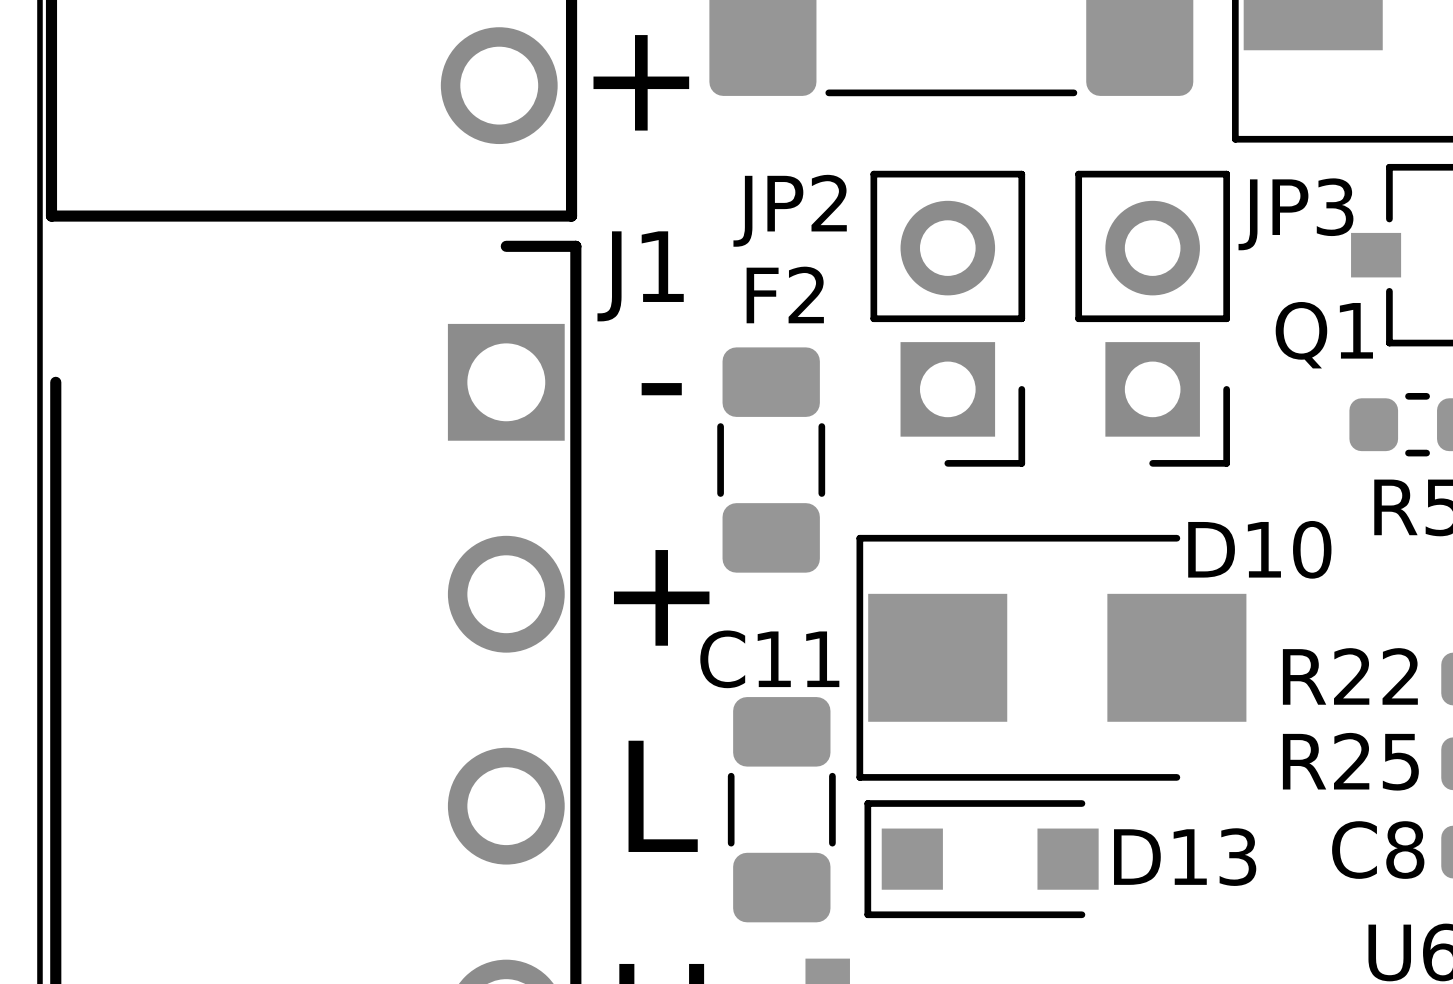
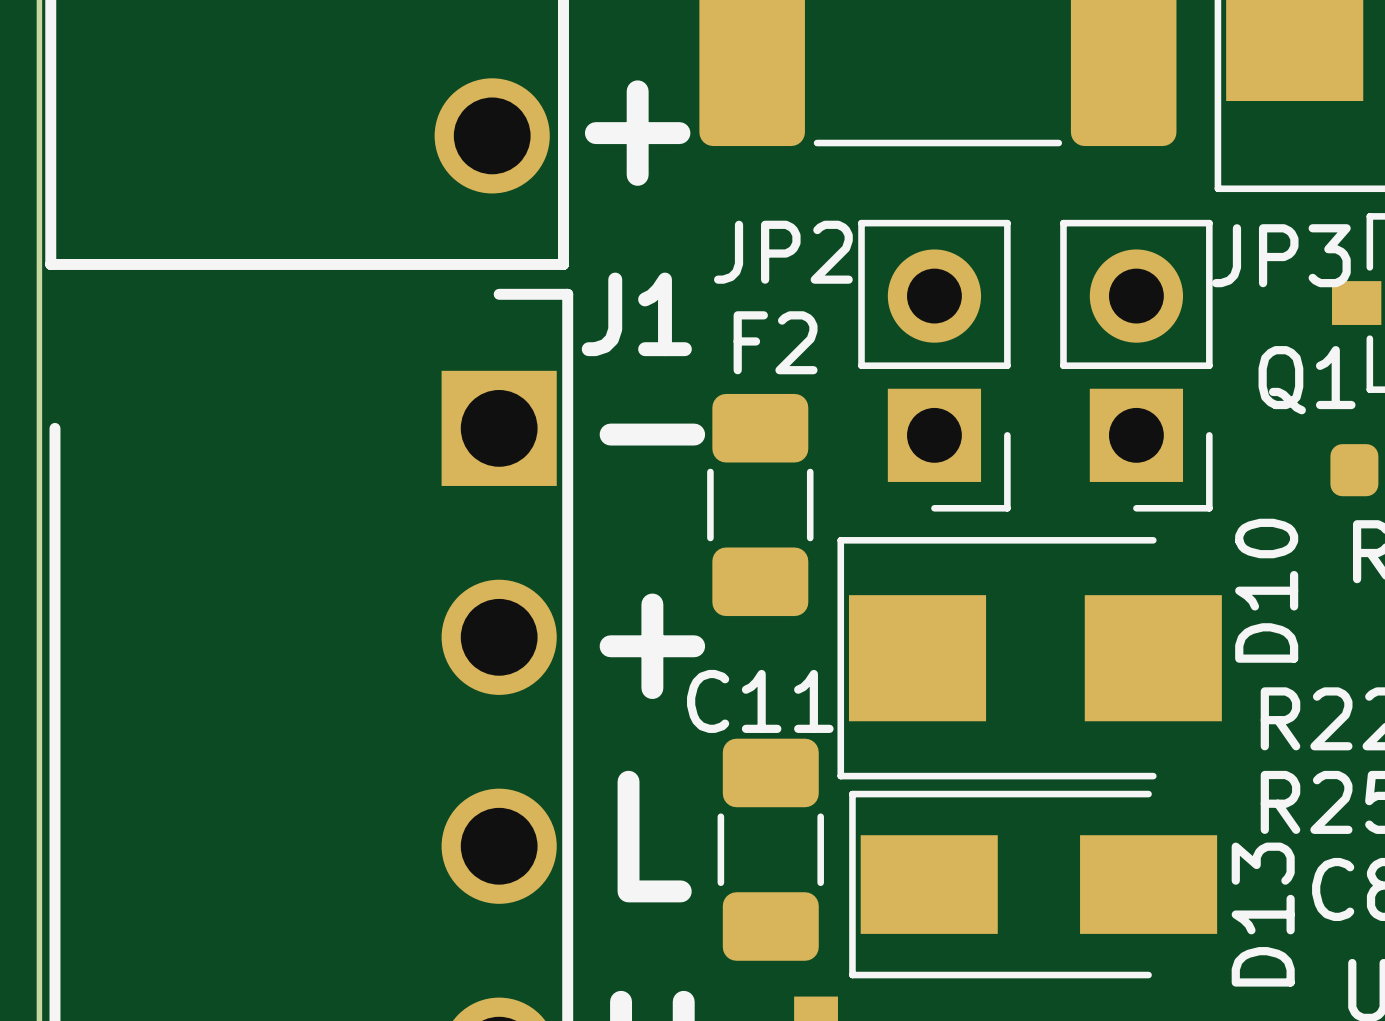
D10 name rotation: 0° (1259, 549) -> 90° counterclockwise (1266, 590)
D10 position: (1051, 657) -> (1029, 658)
D13 footprint: [864, 800, 1099, 919] -> [849, 790, 1218, 979]

